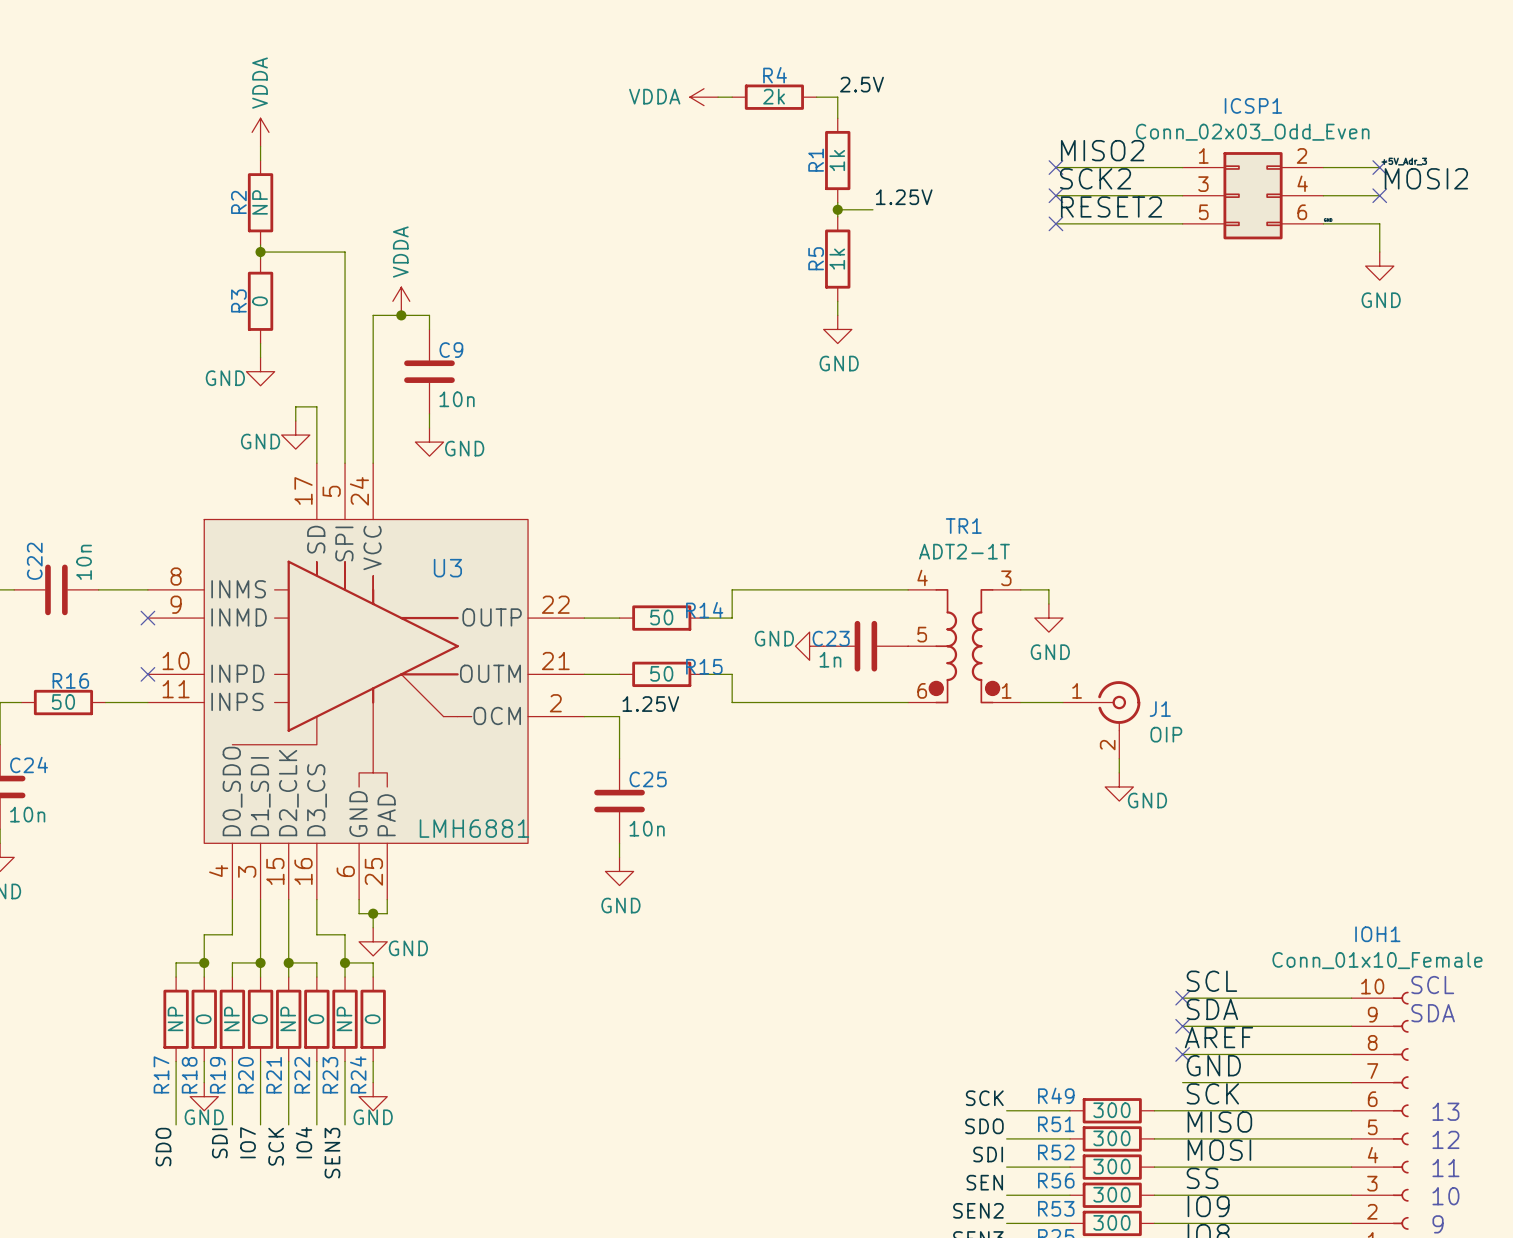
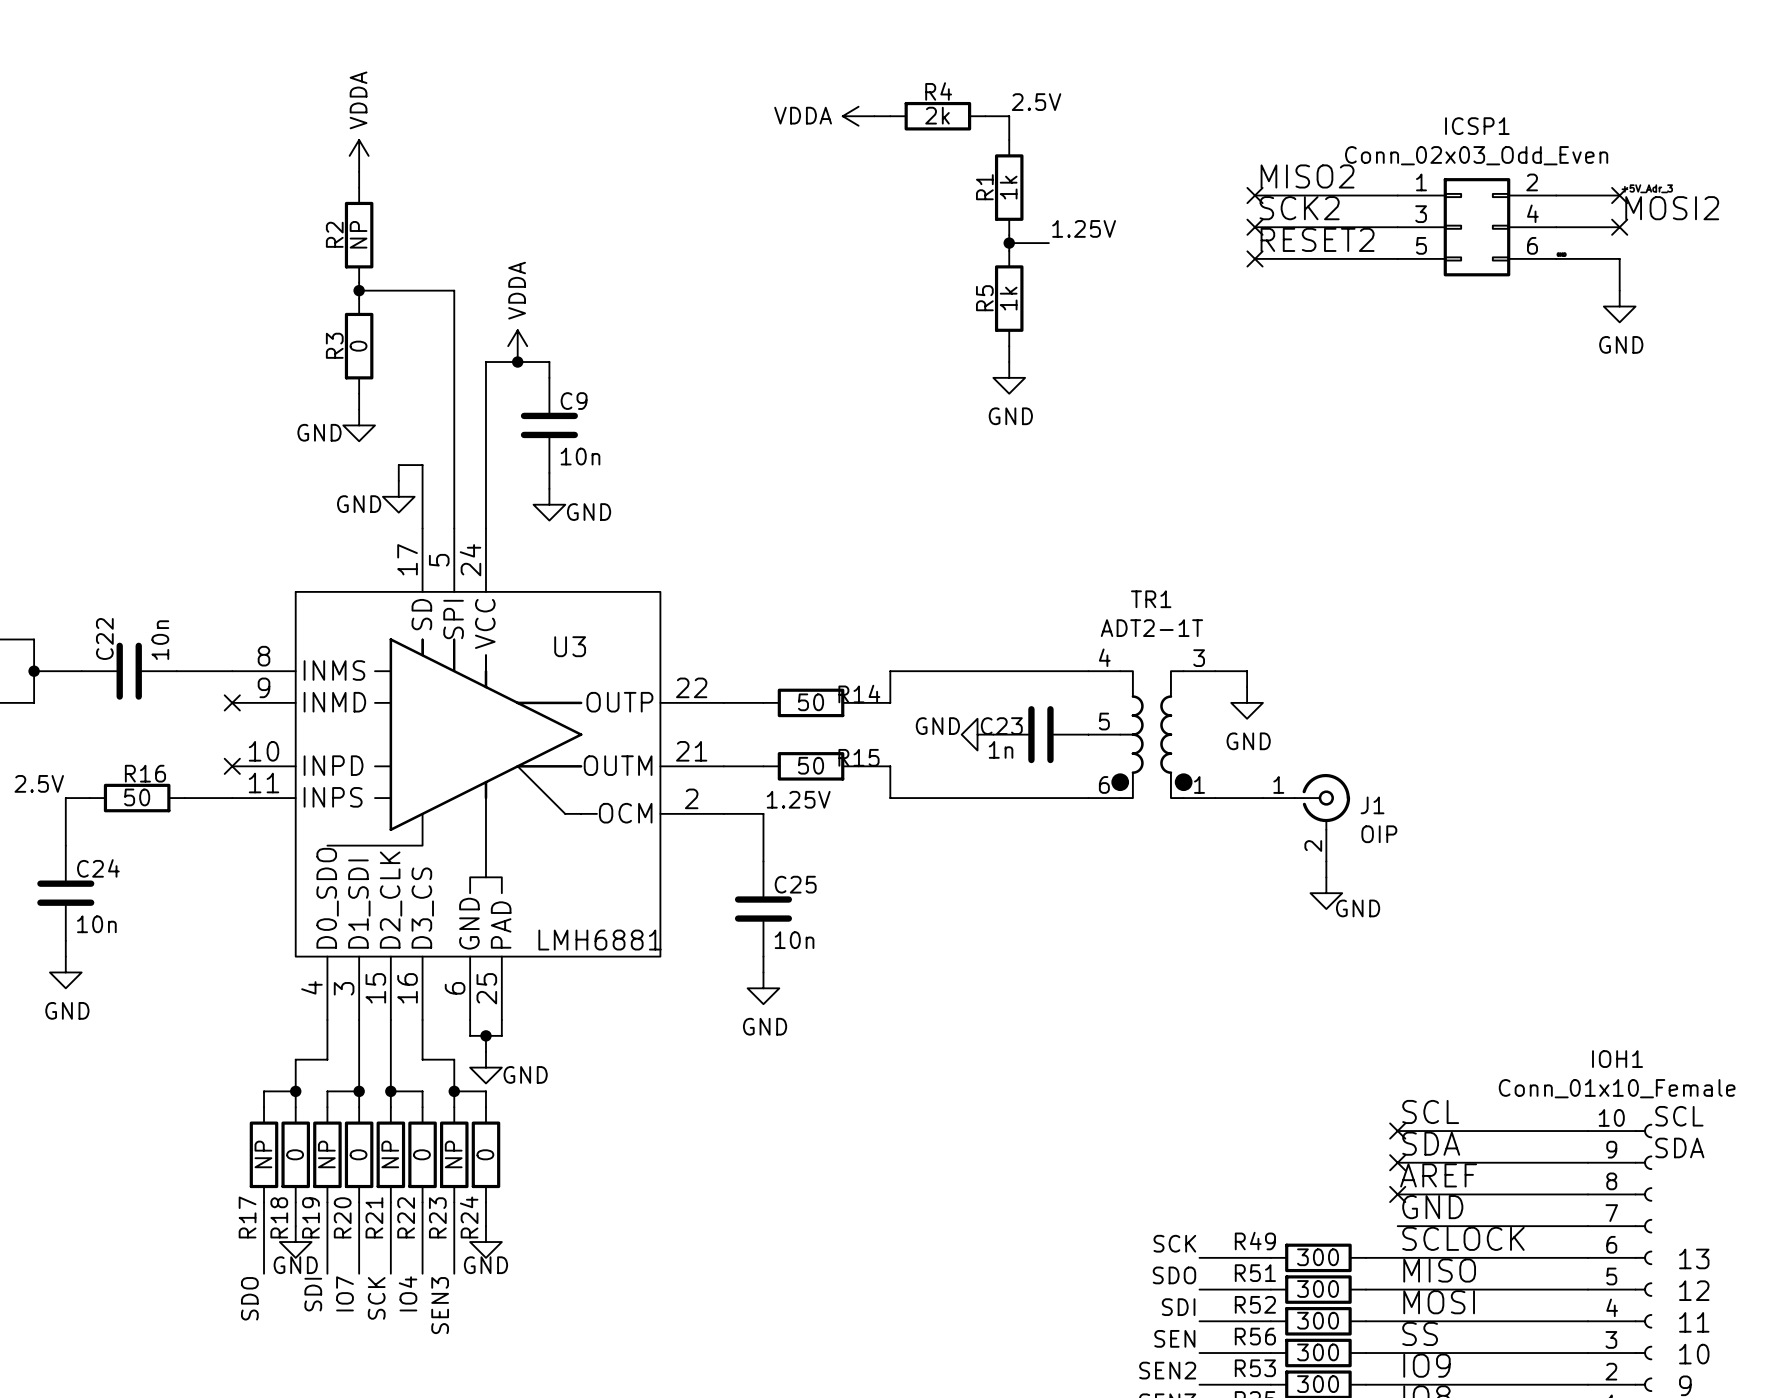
label: SCK (1212, 1093) -> SCLOCK (1463, 1238)

